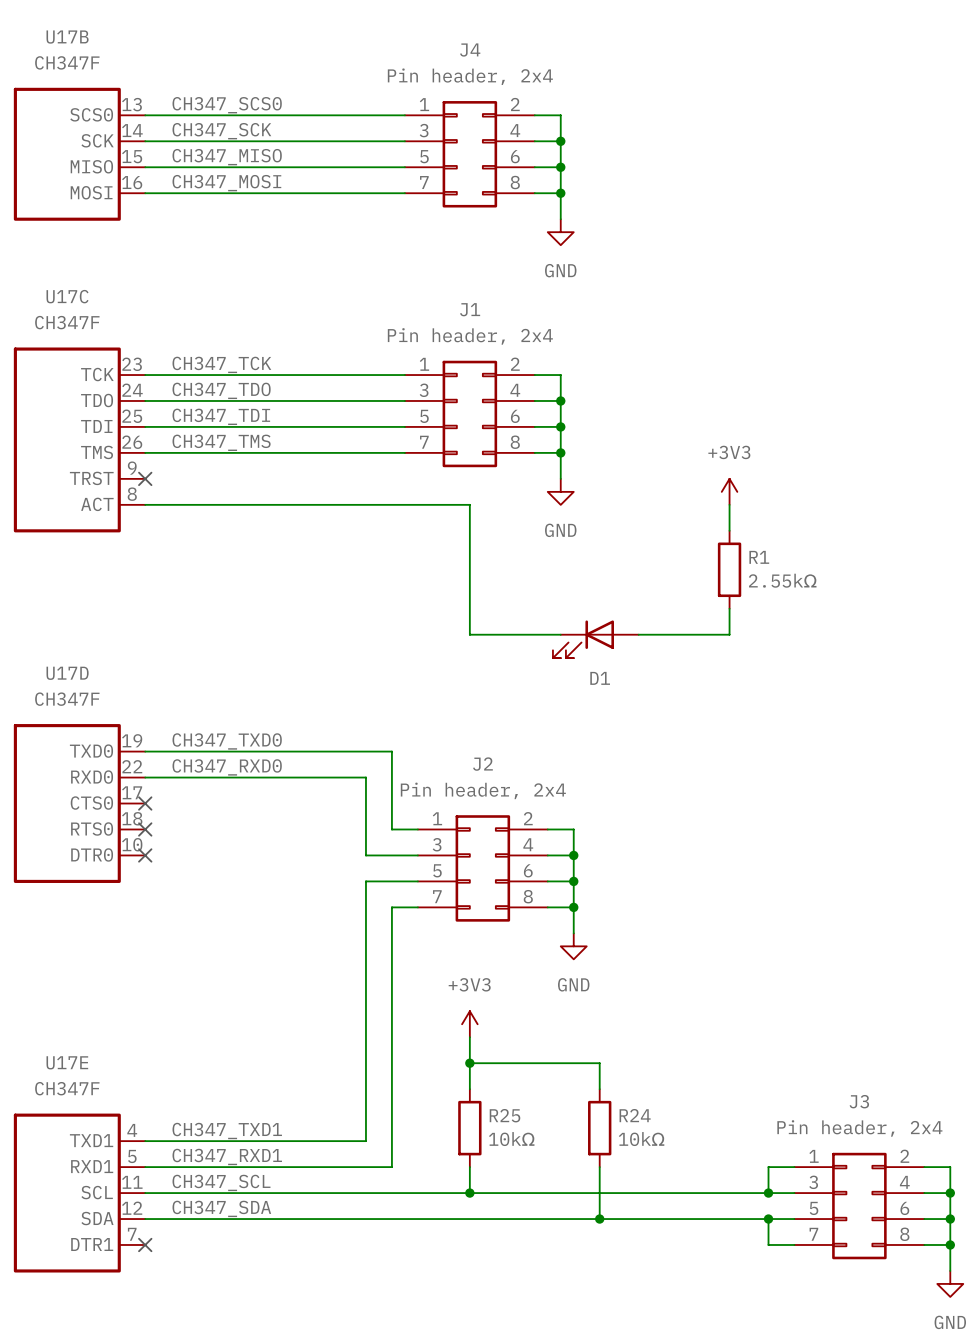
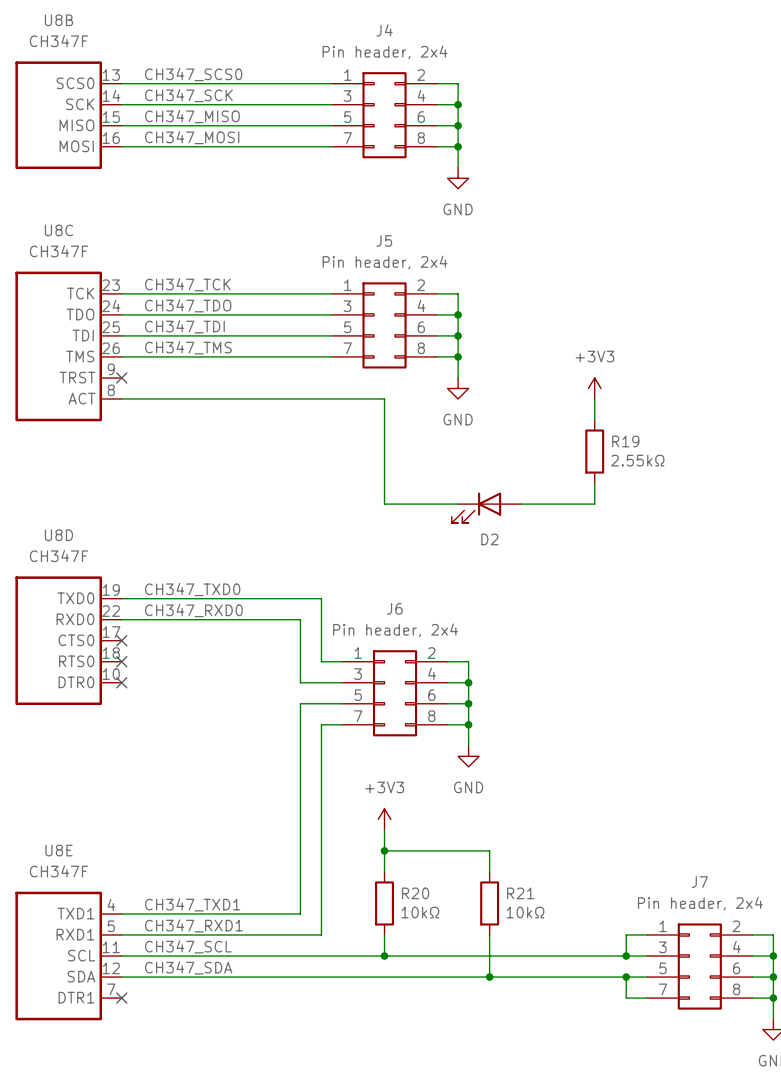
U17B name: U17B (67, 37) -> U8B (58, 20)
U17C name: U17C (67, 296) -> U8C (58, 230)
J1 name: J1 (470, 309) -> J5 (384, 240)
R1 name: R1 (759, 557) -> R19 (625, 441)
U17D name: U17D (67, 673) -> U8D (58, 535)
D1 name: D1 (600, 678) -> D2 (489, 539)
J2 name: J2 (482, 764) -> J6 (394, 608)
U17E name: U17E (67, 1062) -> U8E (58, 850)
J3 name: J3 (859, 1101) -> J7 (699, 882)
R25 name: R25 (504, 1115) -> R20 (415, 893)
R24 name: R24 (635, 1115) -> R21 (520, 893)

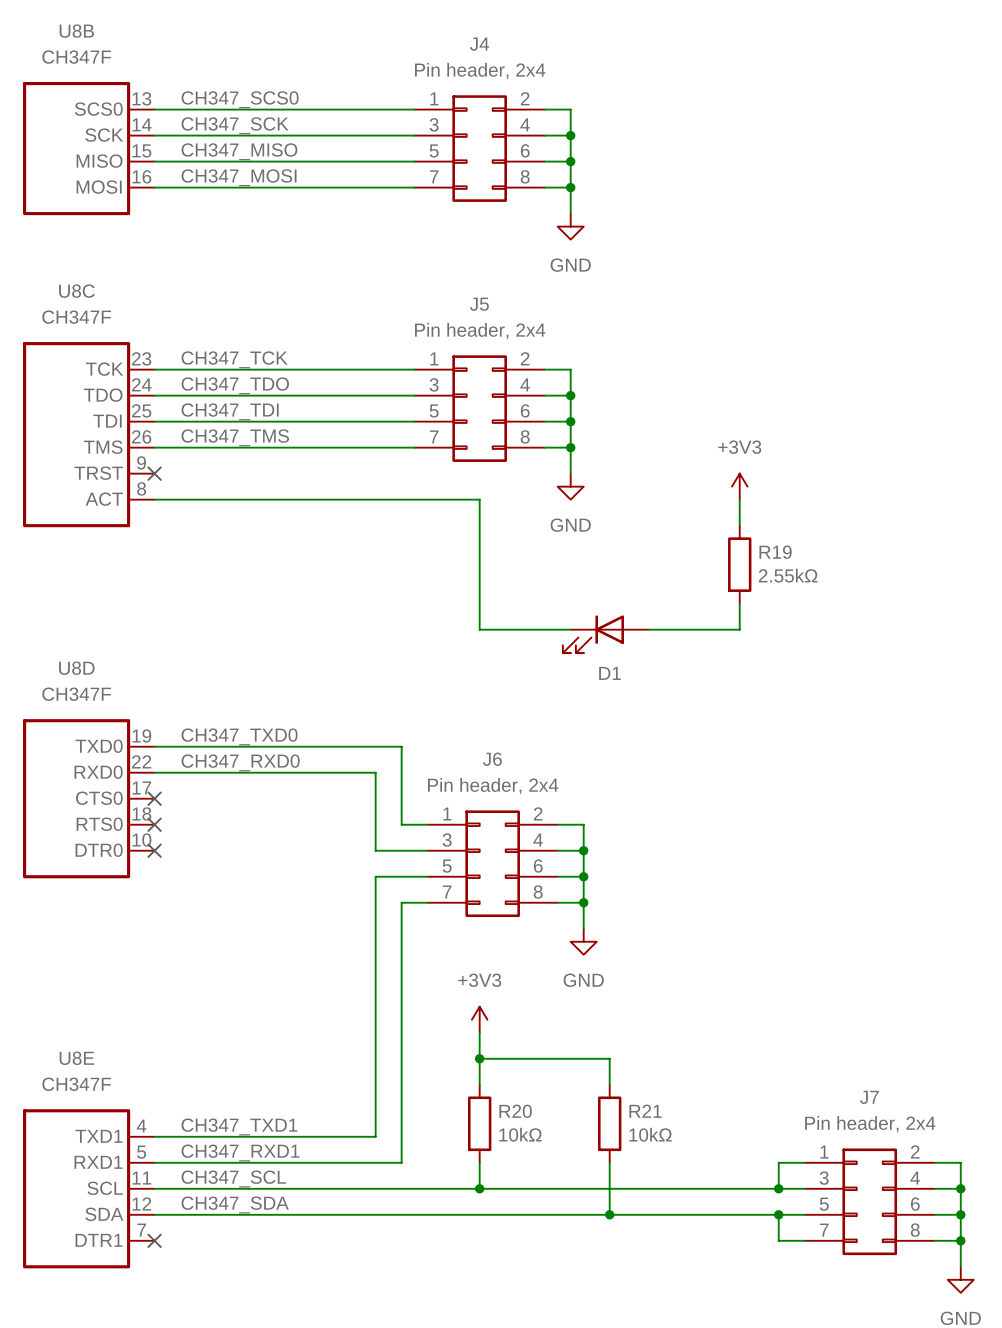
D2 name: D2 (489, 539) -> D1 (610, 673)

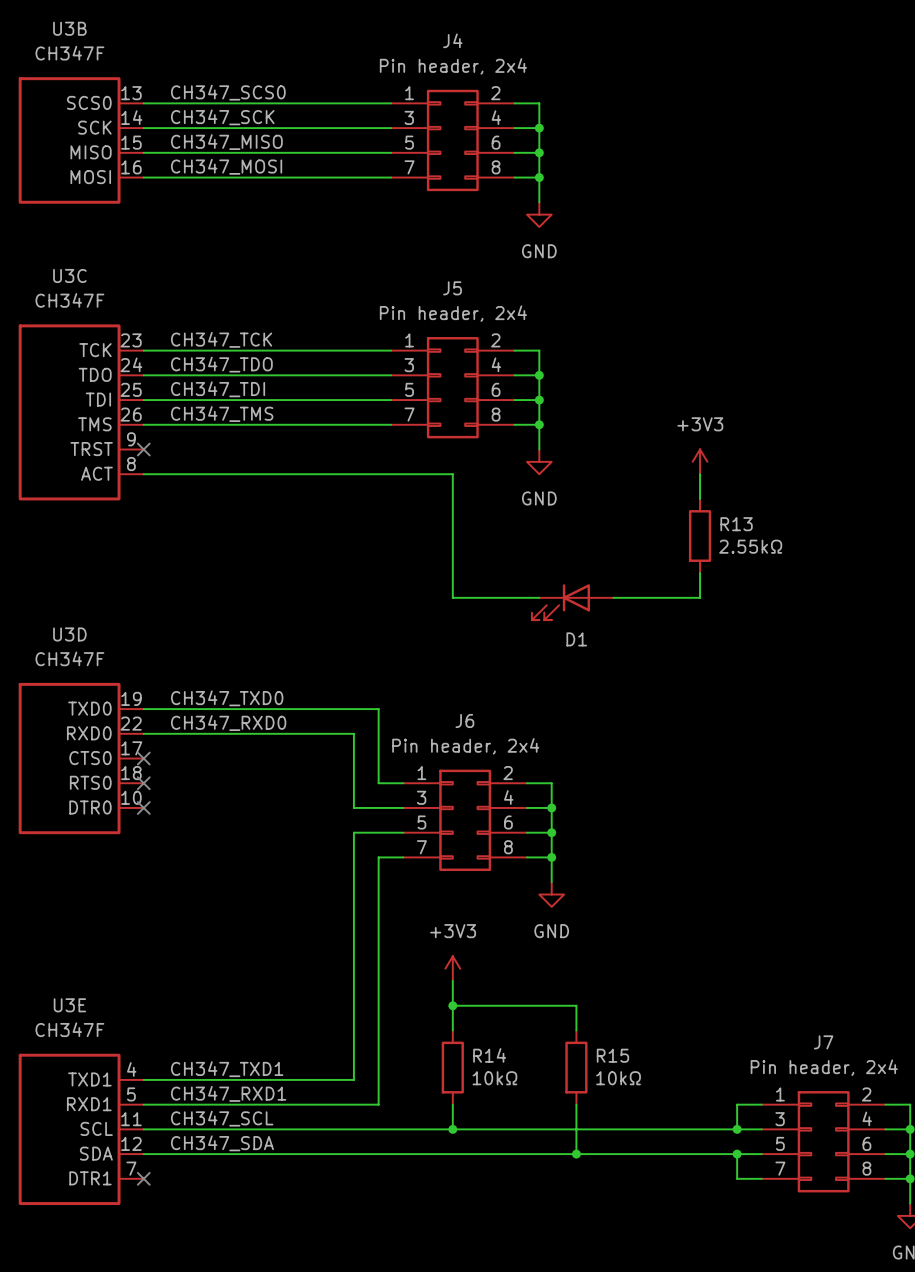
U8B name: U8B (76, 31) -> U3B (69, 28)
U8C name: U8C (76, 291) -> U3C (69, 275)
R19 name: R19 (775, 552) -> R13 (736, 524)
U8D name: U8D (76, 668) -> U3D (69, 634)
U8E name: U8E (76, 1058) -> U3E (69, 1005)
R20 name: R20 (515, 1111) -> R14 (489, 1055)
R21 name: R21 (645, 1111) -> R15 (612, 1055)

